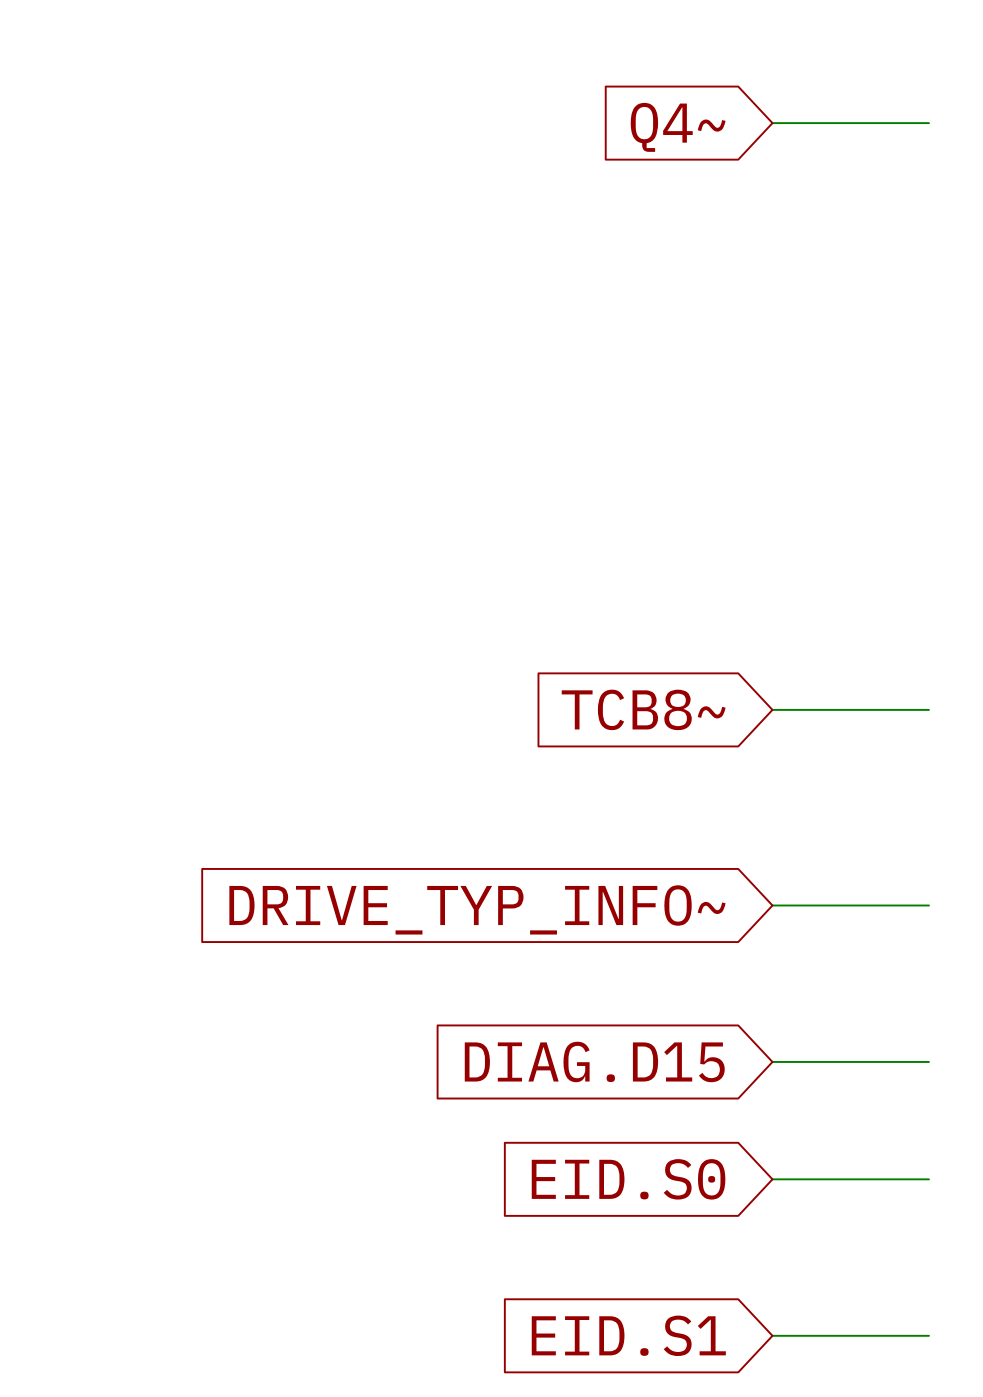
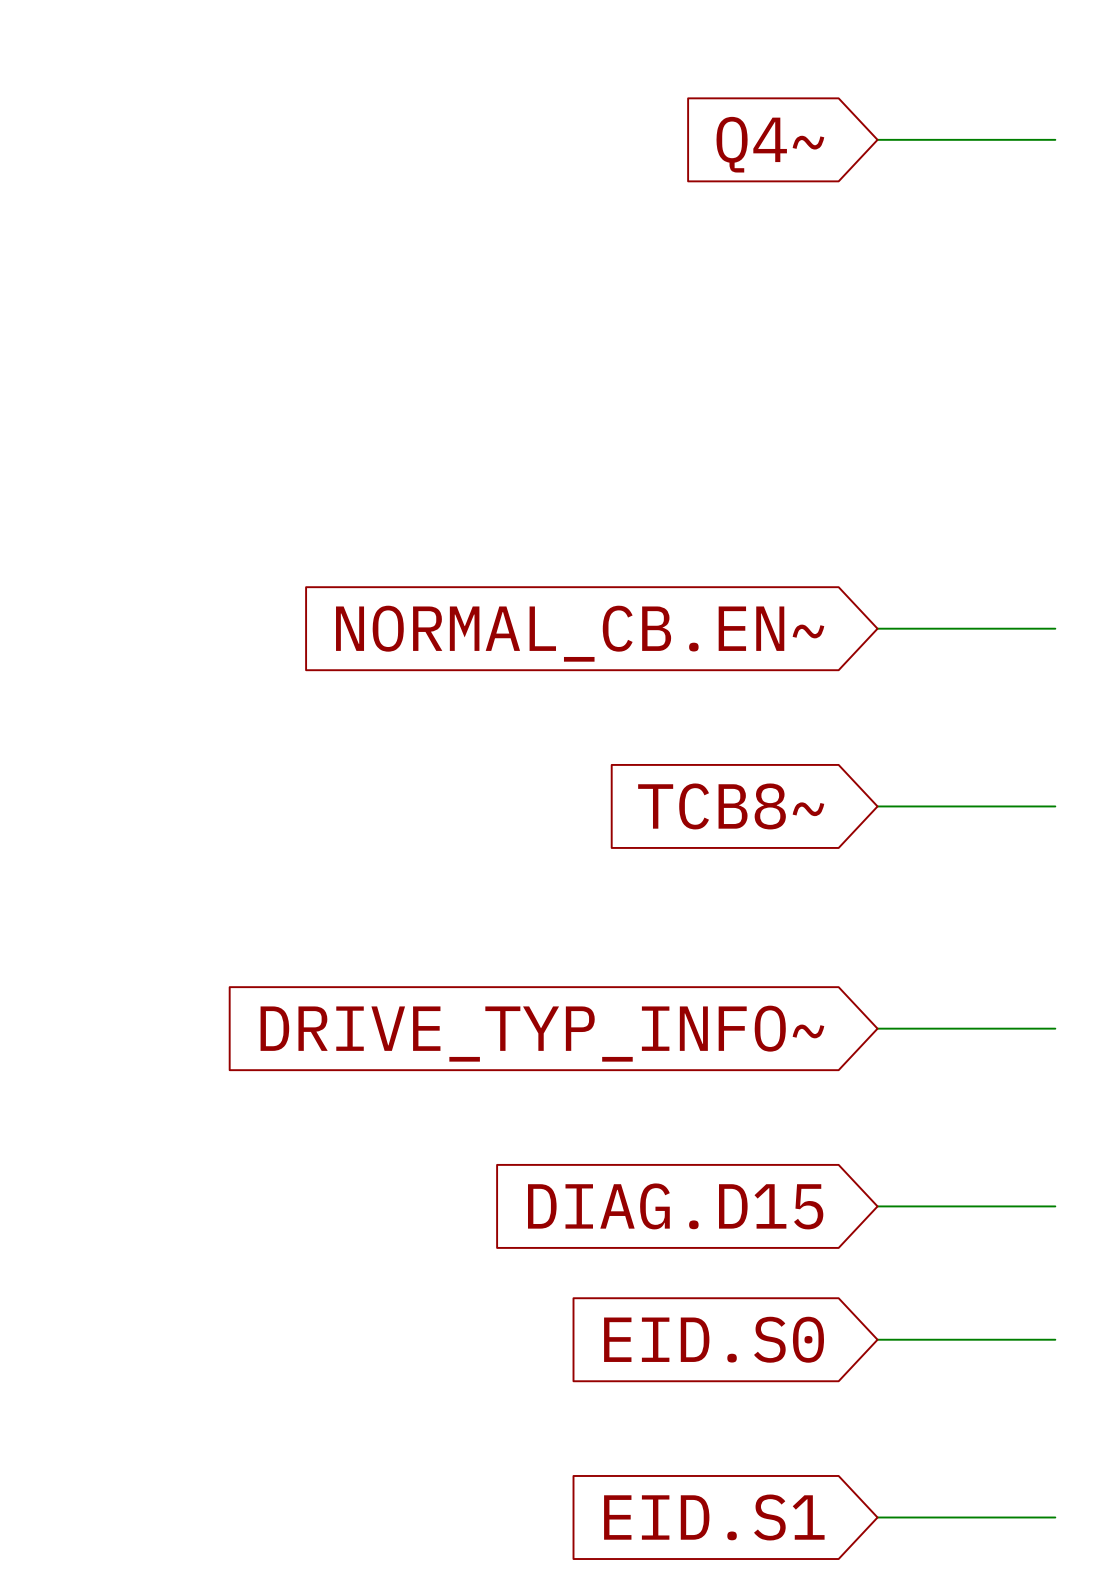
wire: none -> (877, 628) (1055, 628)
global label: none -> NORMAL_CB.EN~ (580, 633)

